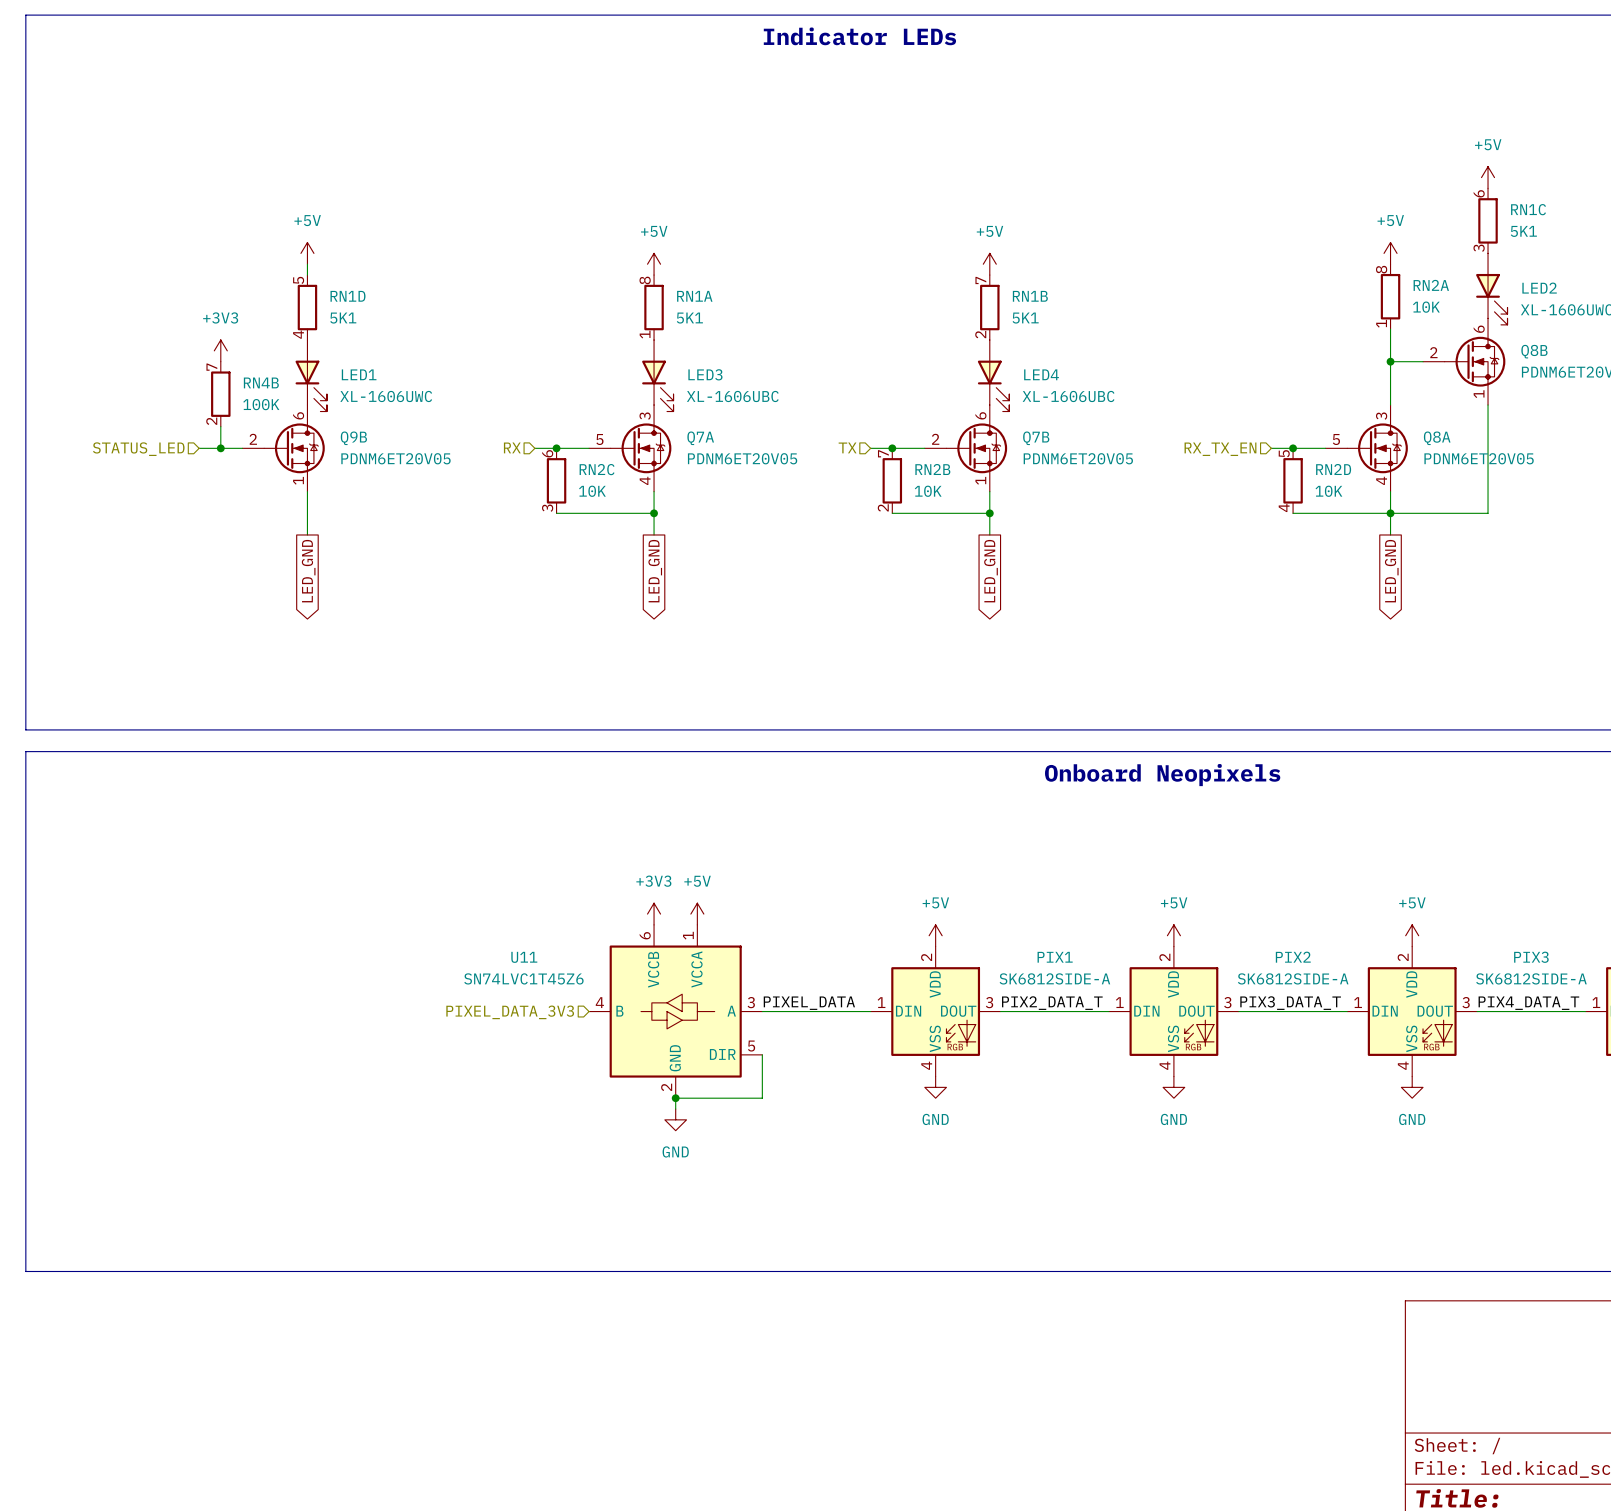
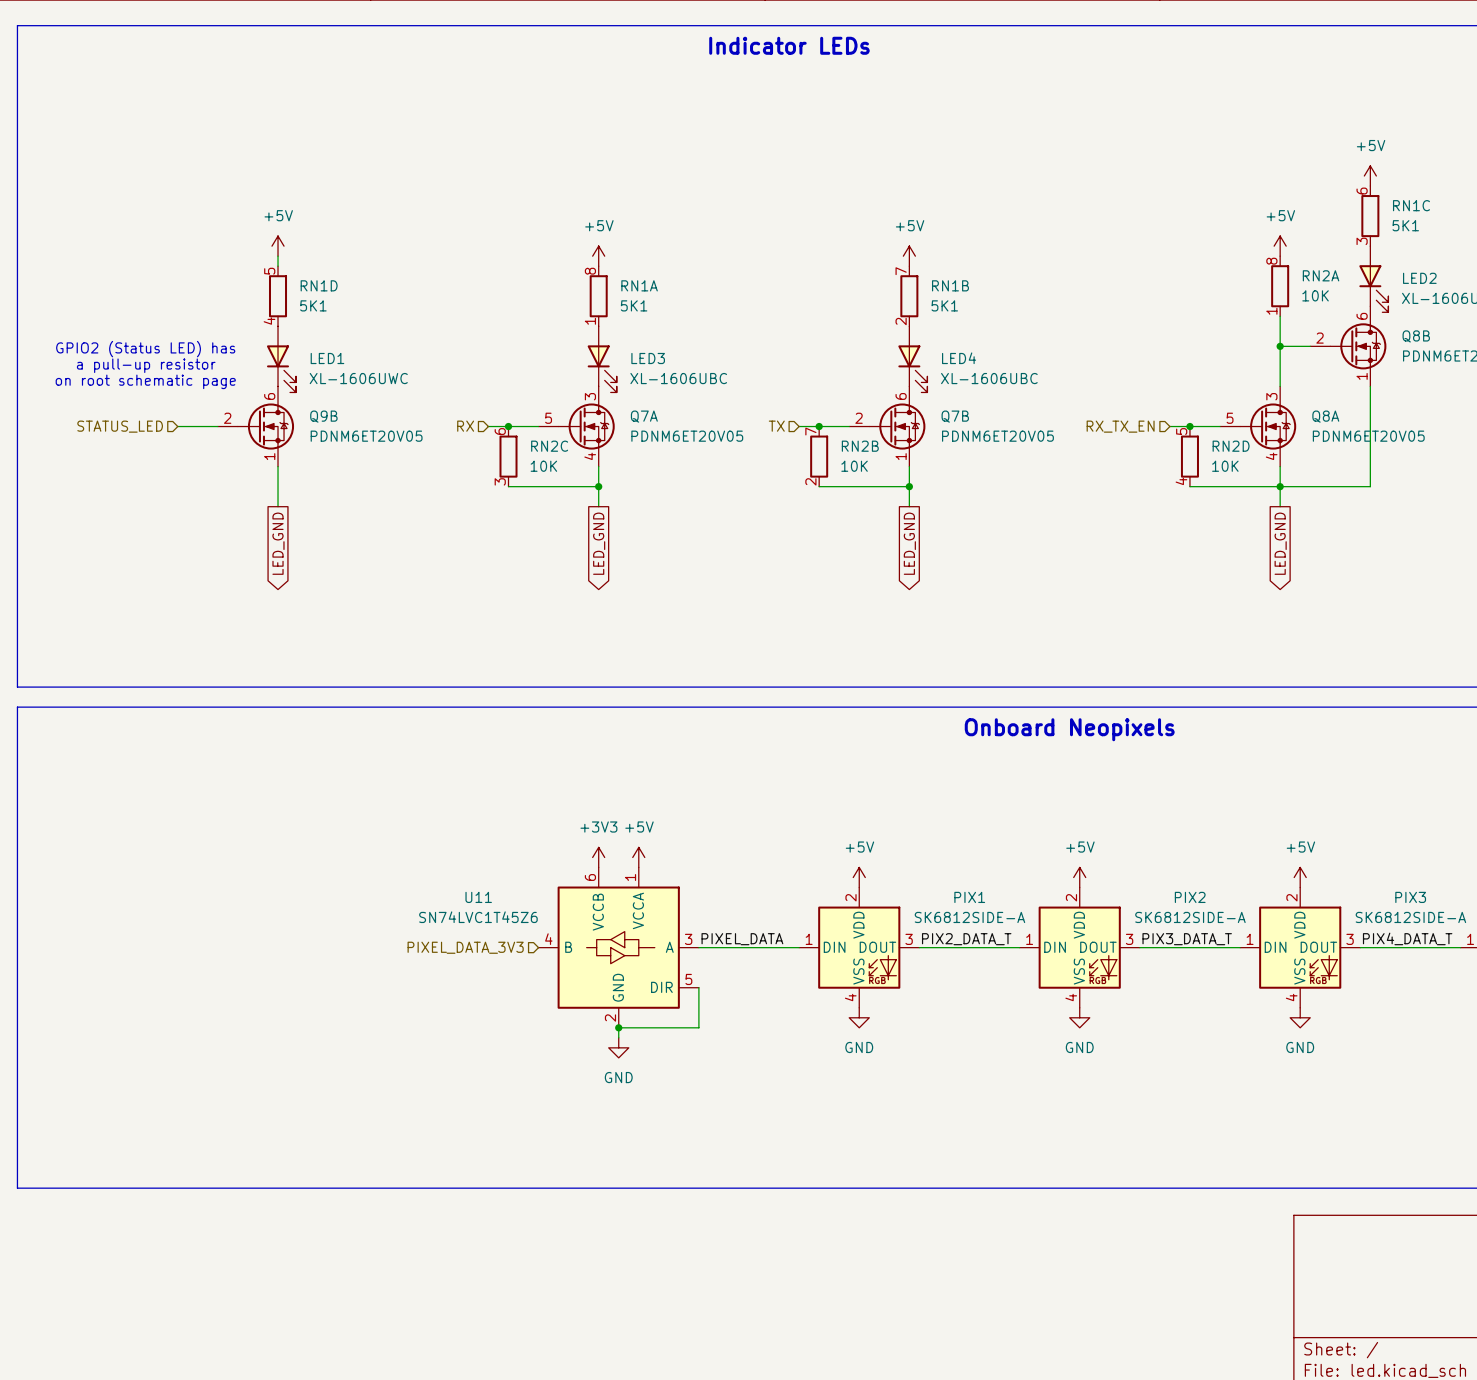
power symbol: +3V3 (220, 350) -> none
text: none -> GPIO2 (Status LED) has (145, 349)
text: none -> a pull-up resistor (146, 365)
RN4B: 100K (220, 394) -> none
text: none -> on root schematic page (145, 381)
wire: (220, 426) (220, 448) -> none
junction: (220, 448) -> none

